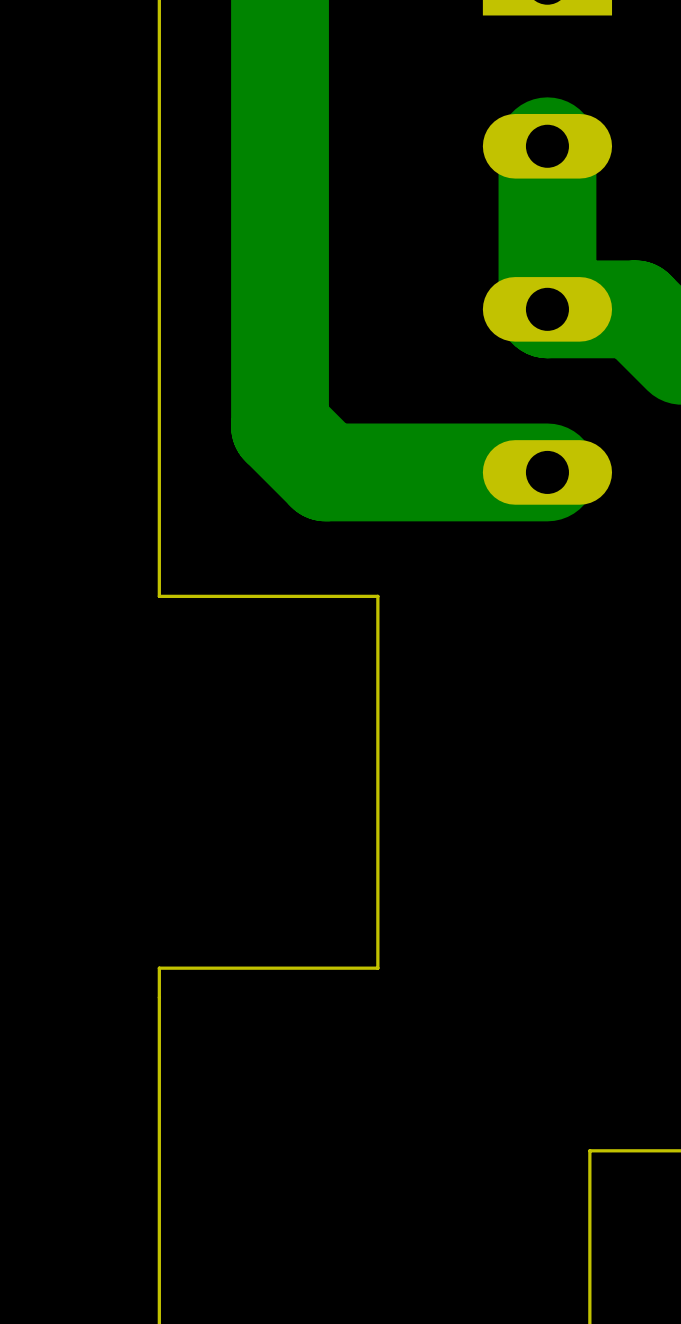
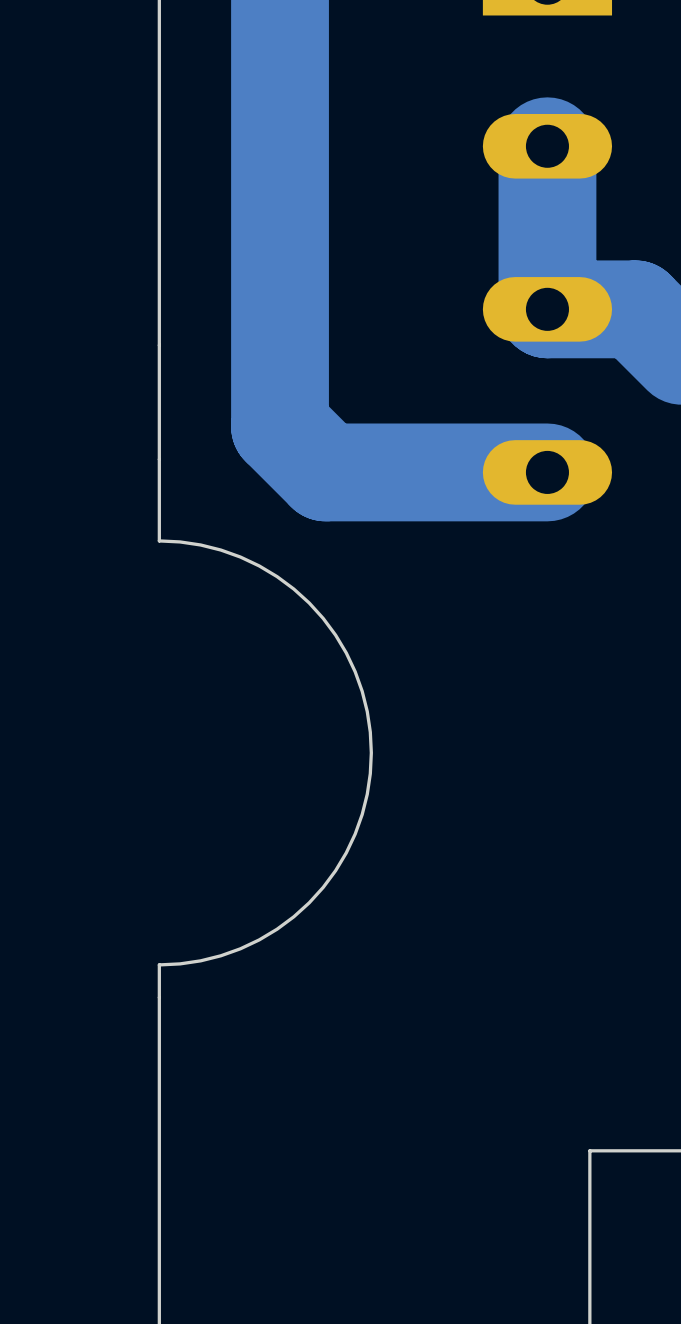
board edge: (159, 540) (159, 596) (377, 596) (377, 968) (159, 968) -> (159, 540) (200, 544) (240, 557) (277, 576) (309, 603) (335, 635) (355, 671) (367, 711) (371, 752) (367, 794) (355, 834) (335, 870) (309, 902) (277, 929) (240, 948) (200, 960) (159, 964) (159, 968)

